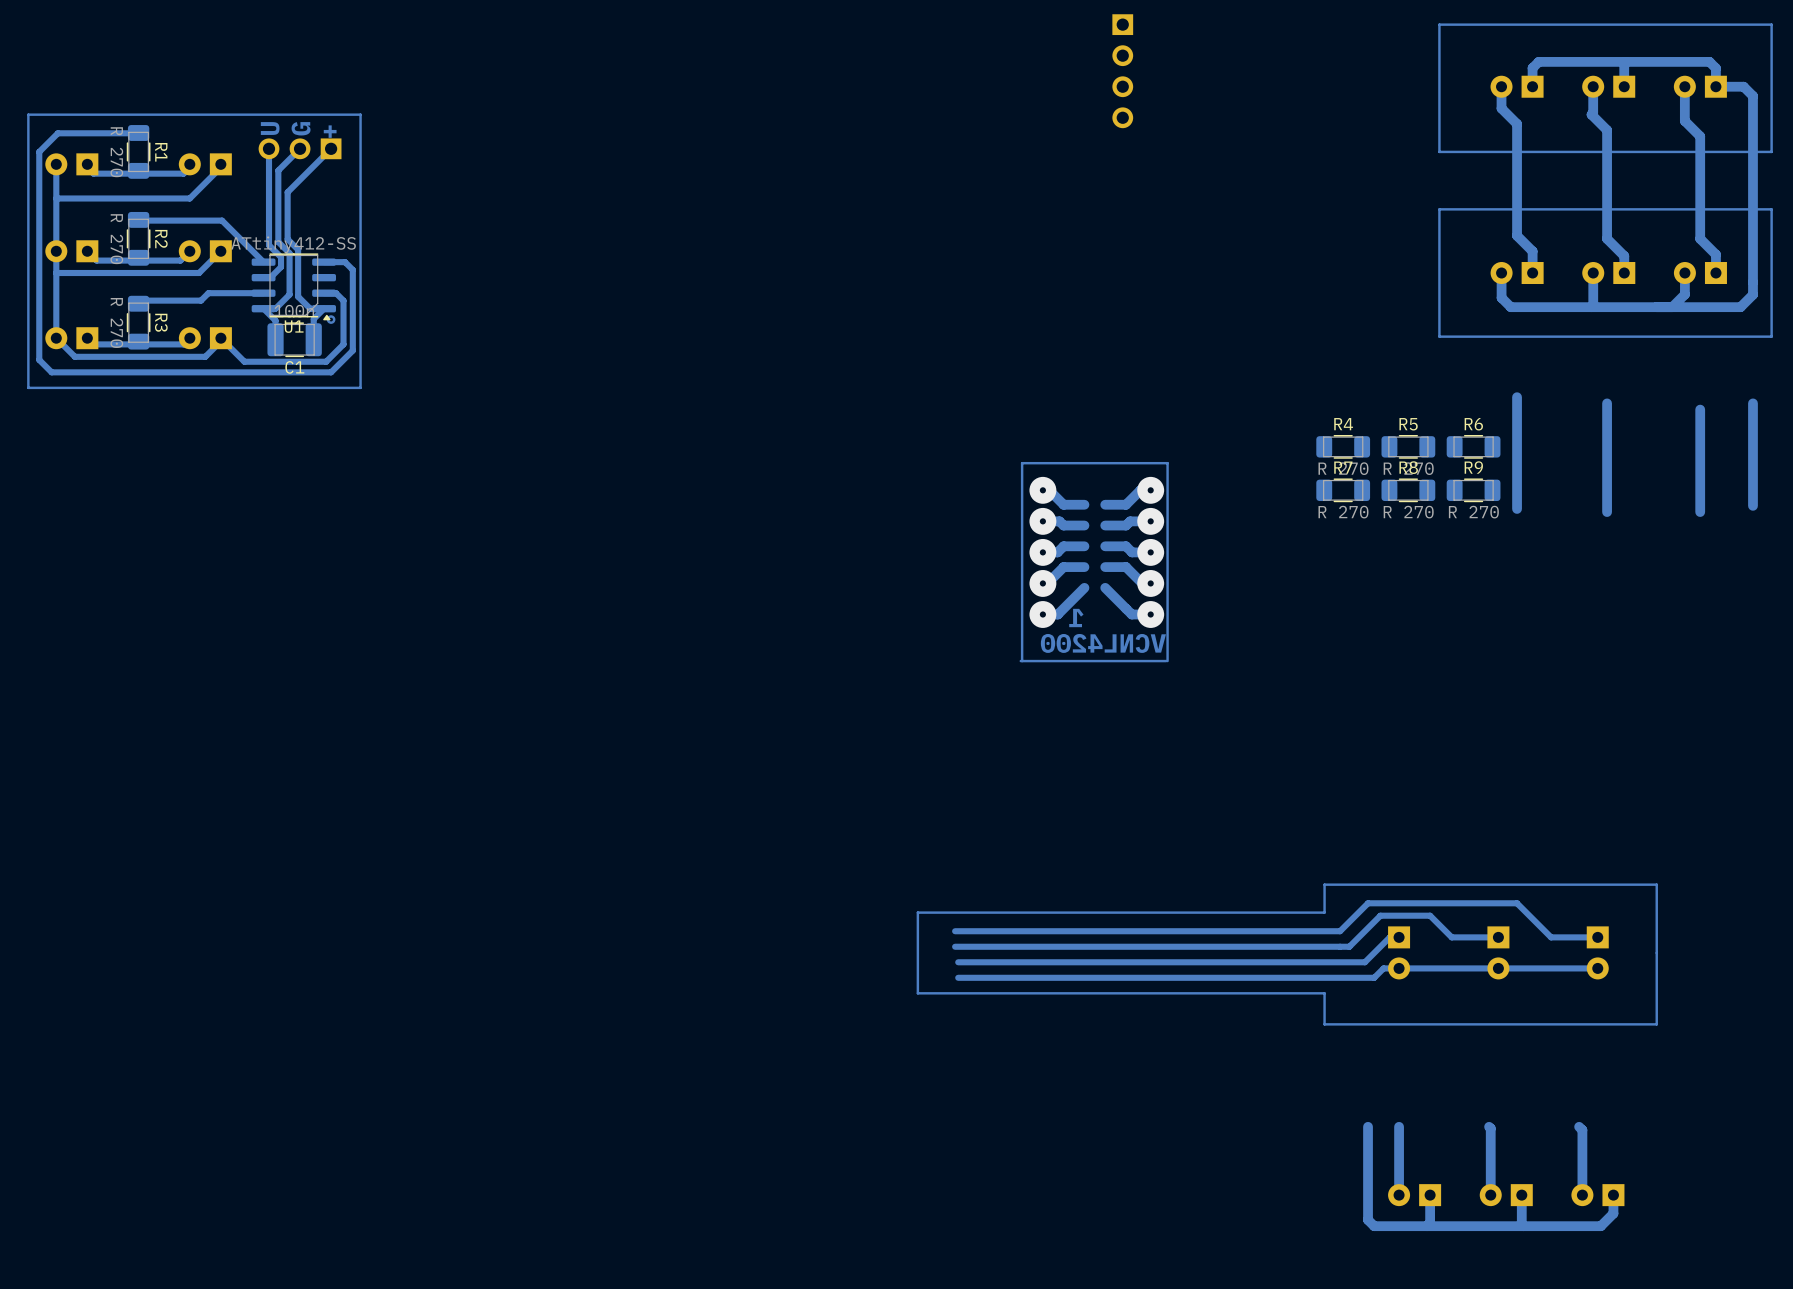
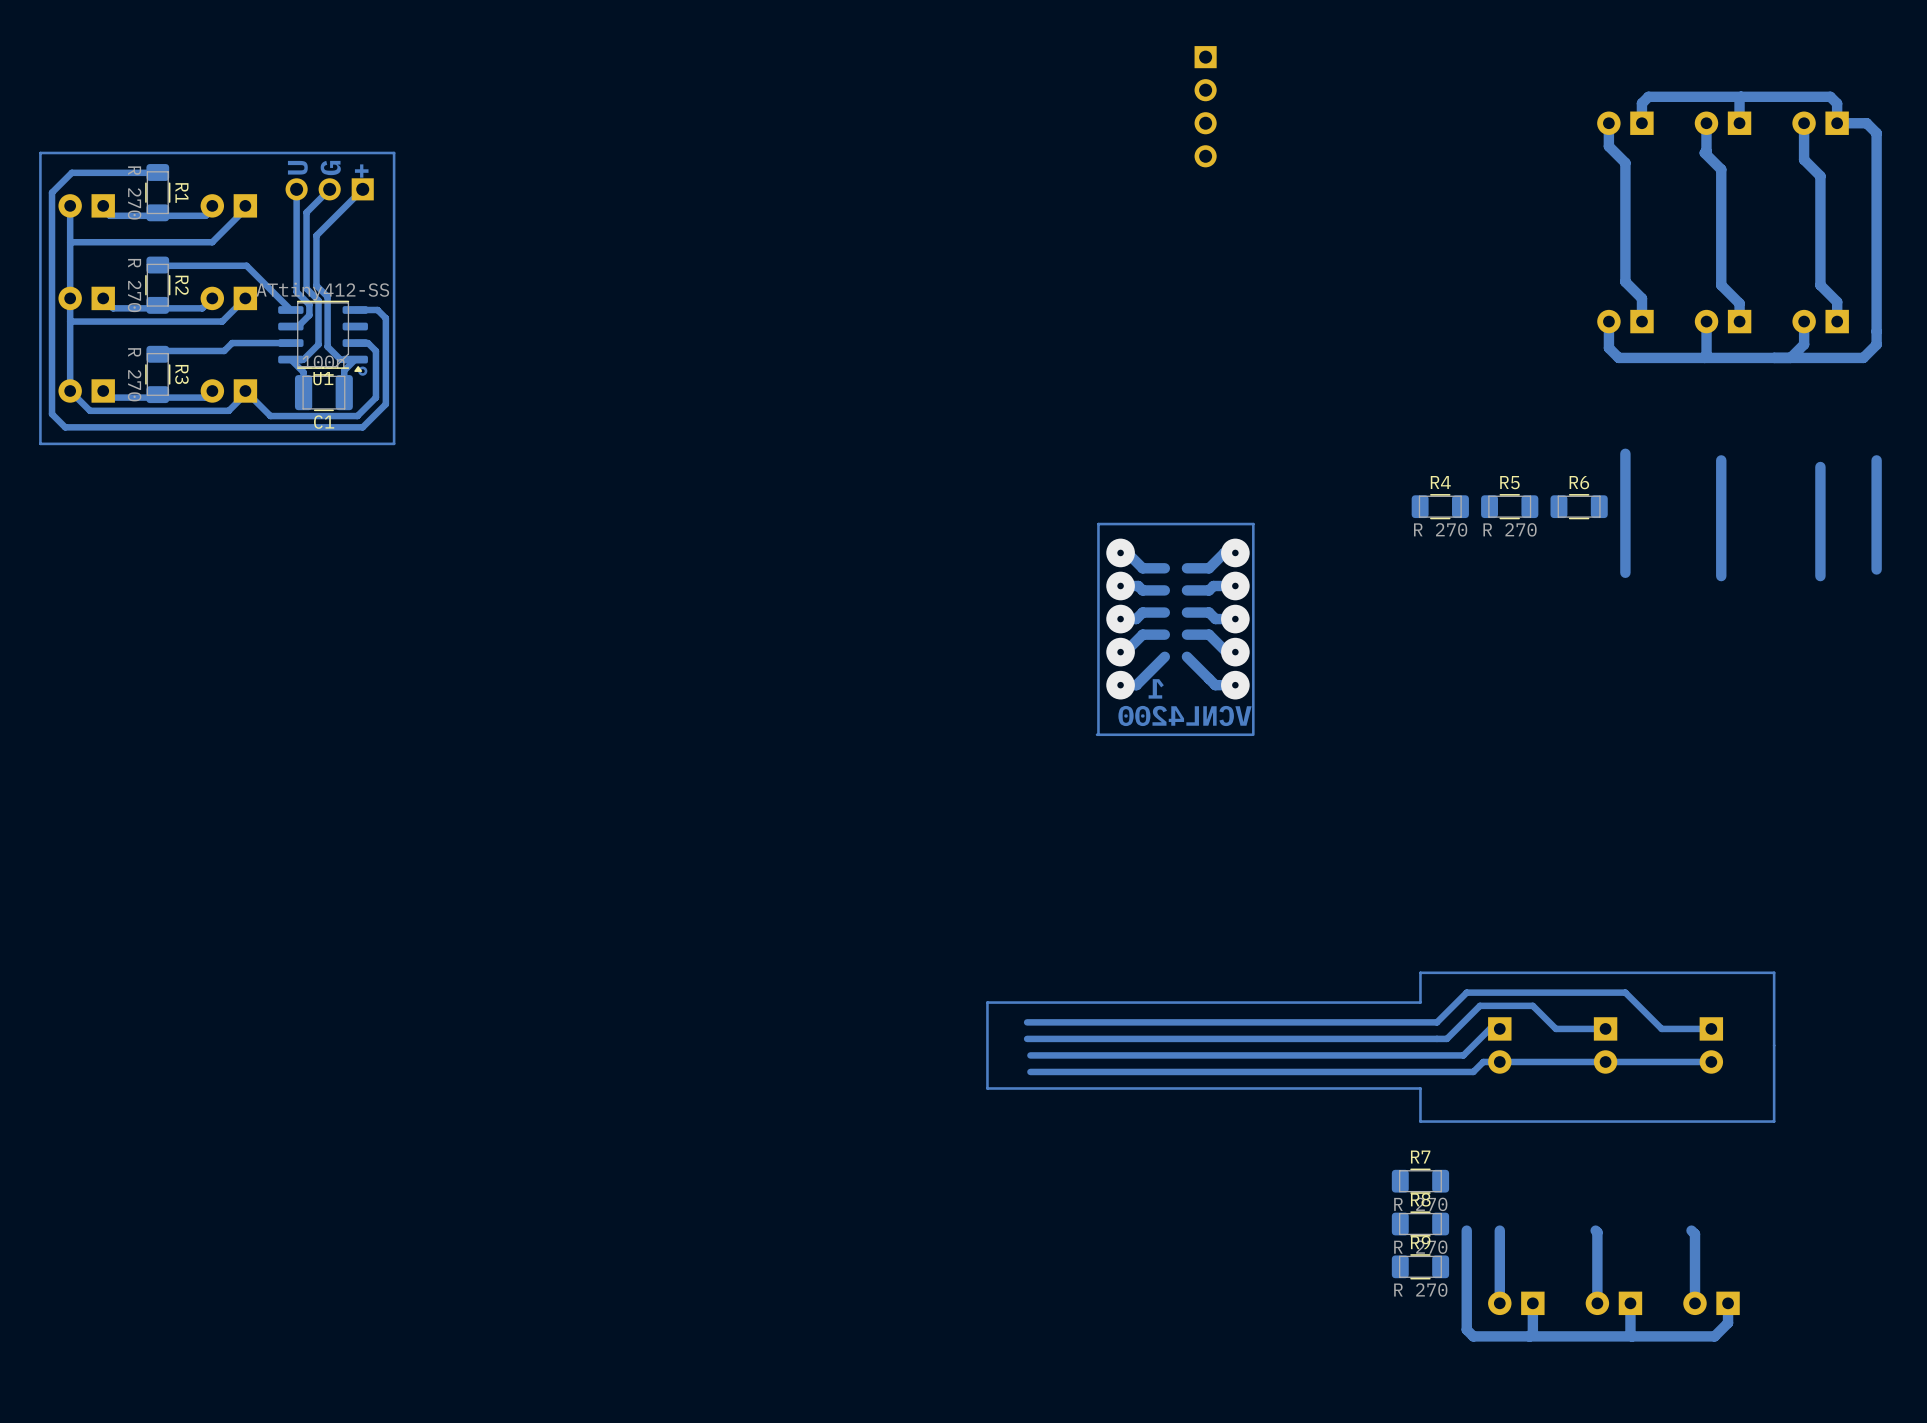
track: (1771, 24) (1439, 24) (1439, 151) (1771, 151) (1771, 24) -> none
track: (1771, 209) (1771, 336) (1439, 336) (1439, 209) (1771, 209) -> none
R7 position: (1343, 490) -> (1420, 1181)
R8 position: (1408, 490) -> (1420, 1224)
R9 position: (1473, 490) -> (1420, 1266)

